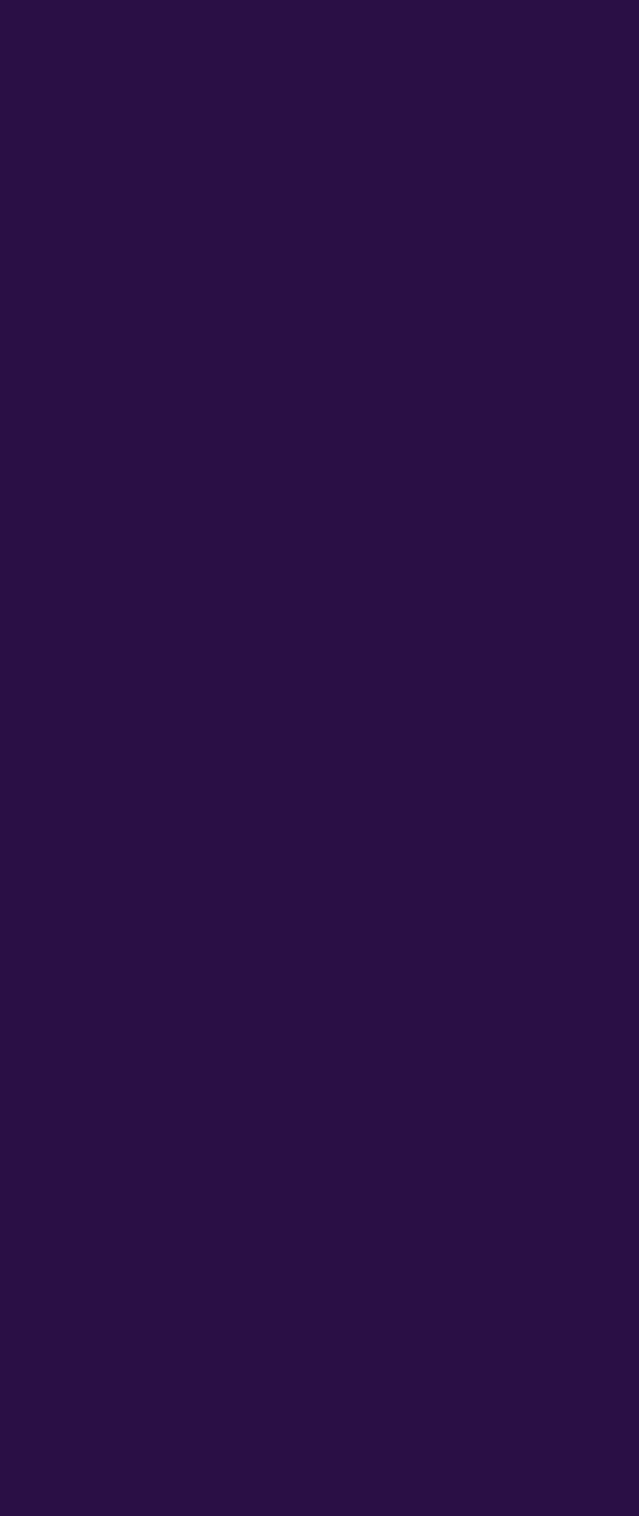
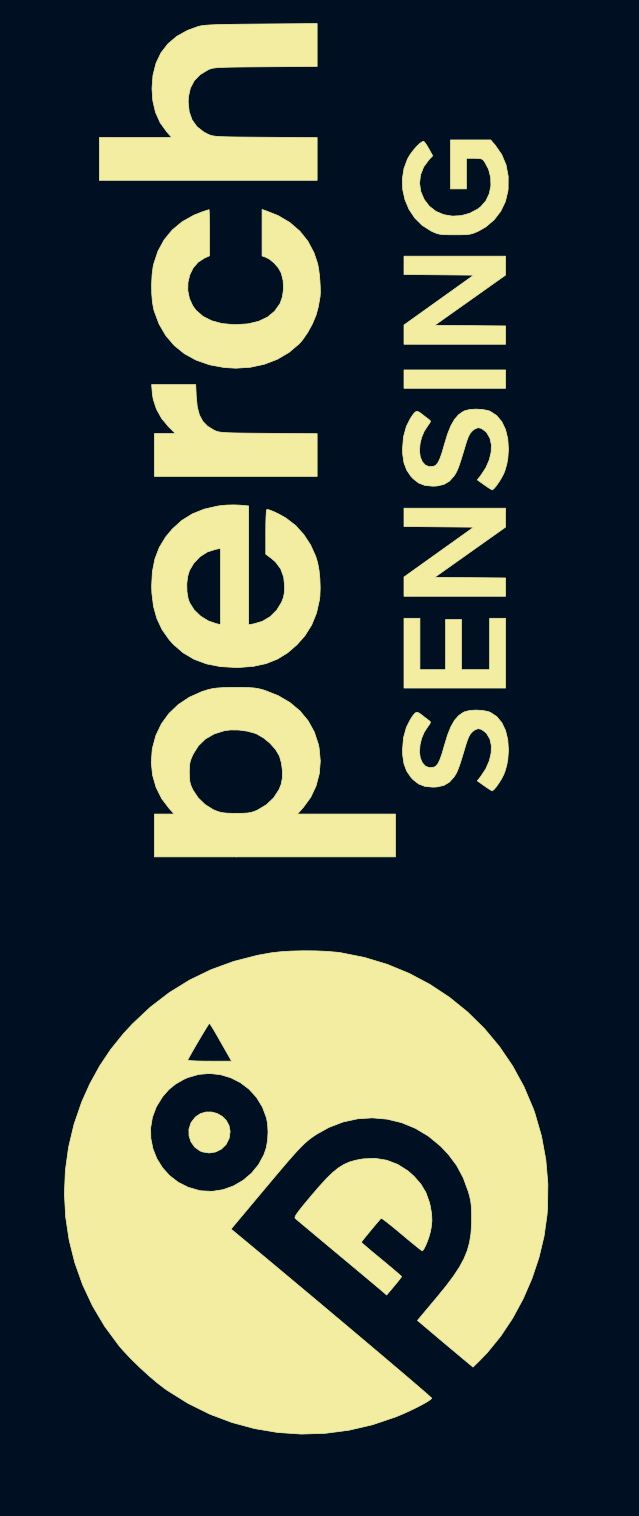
drawing: none -> [64, 23, 549, 1435]

